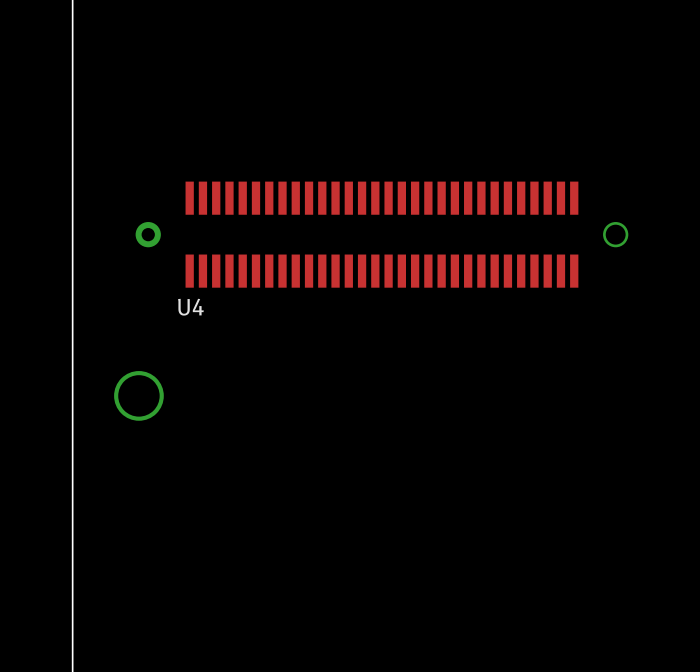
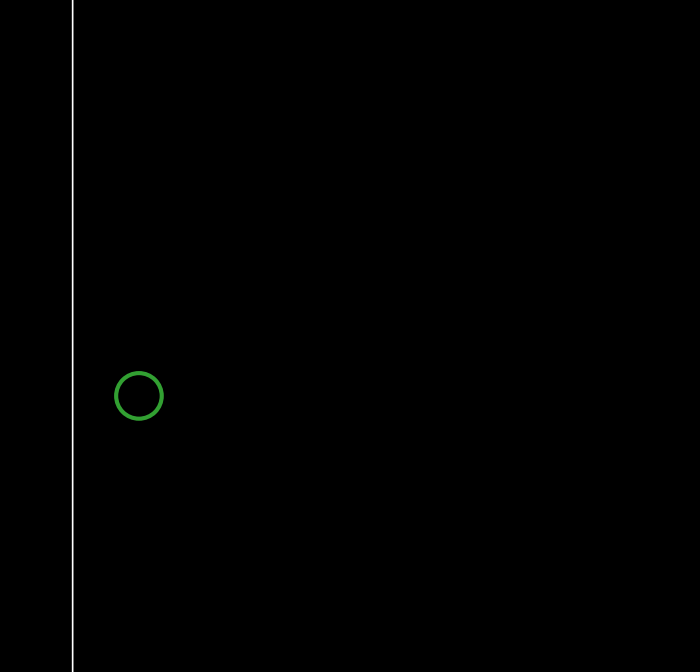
U4: (381, 234) -> none

